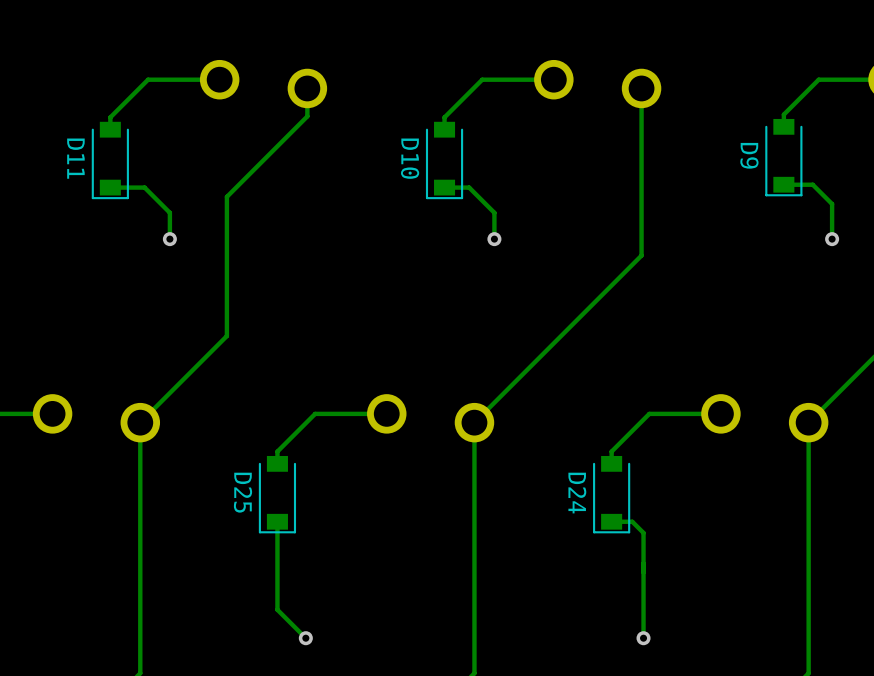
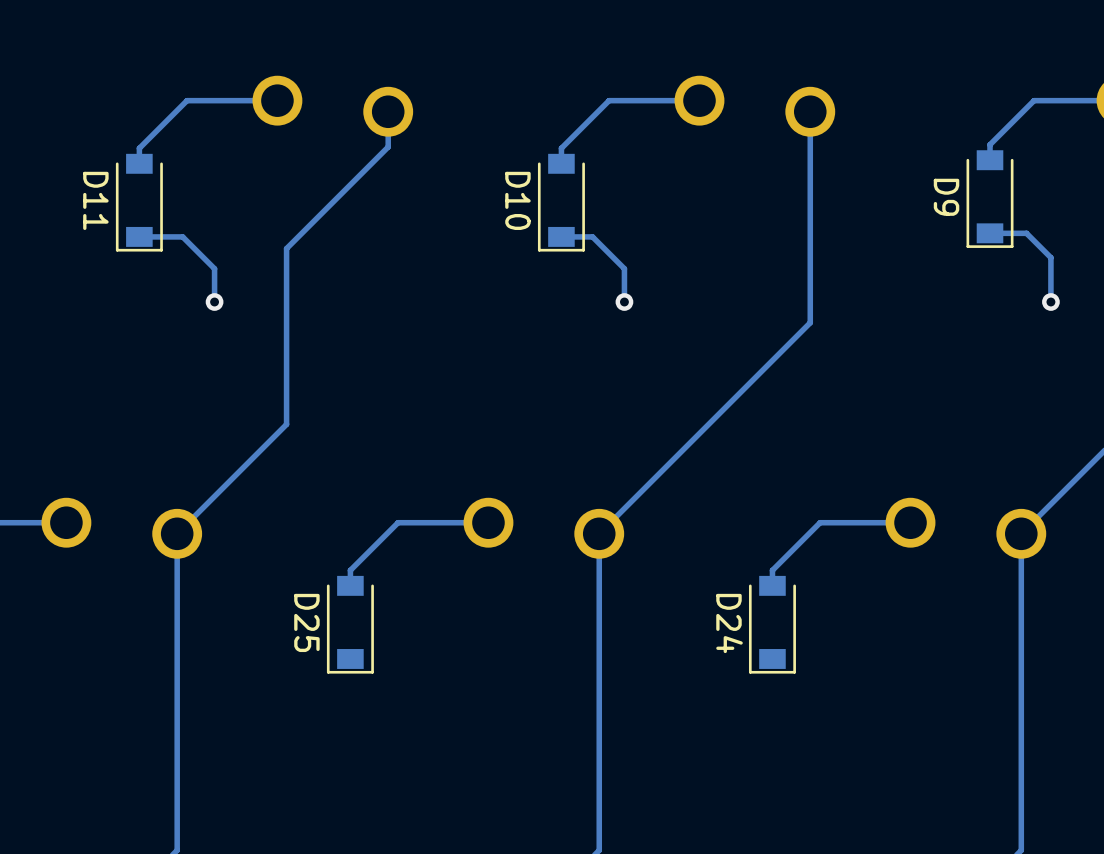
track: (277, 521) (277, 609) (305, 638) -> none
track: (611, 521) (632, 521) (643, 532) (643, 638) -> none
via: (305, 638) -> none
via: (643, 638) -> none

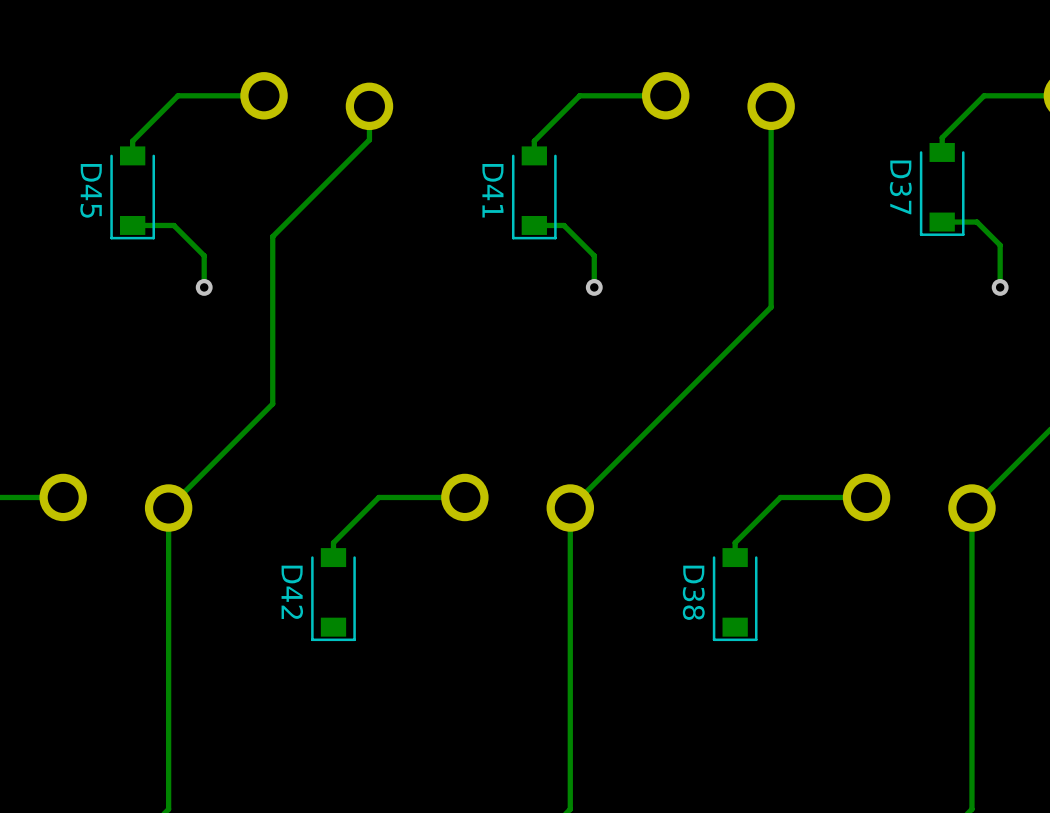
D9 name: D9 (946, 197) -> D37 (900, 187)
D11 name: D11 (95, 200) -> D45 (91, 190)
D10 name: D10 (517, 200) -> D41 (492, 190)
D25 name: D25 (306, 622) -> D42 (292, 592)
D24 name: D24 (729, 623) -> D38 (693, 592)

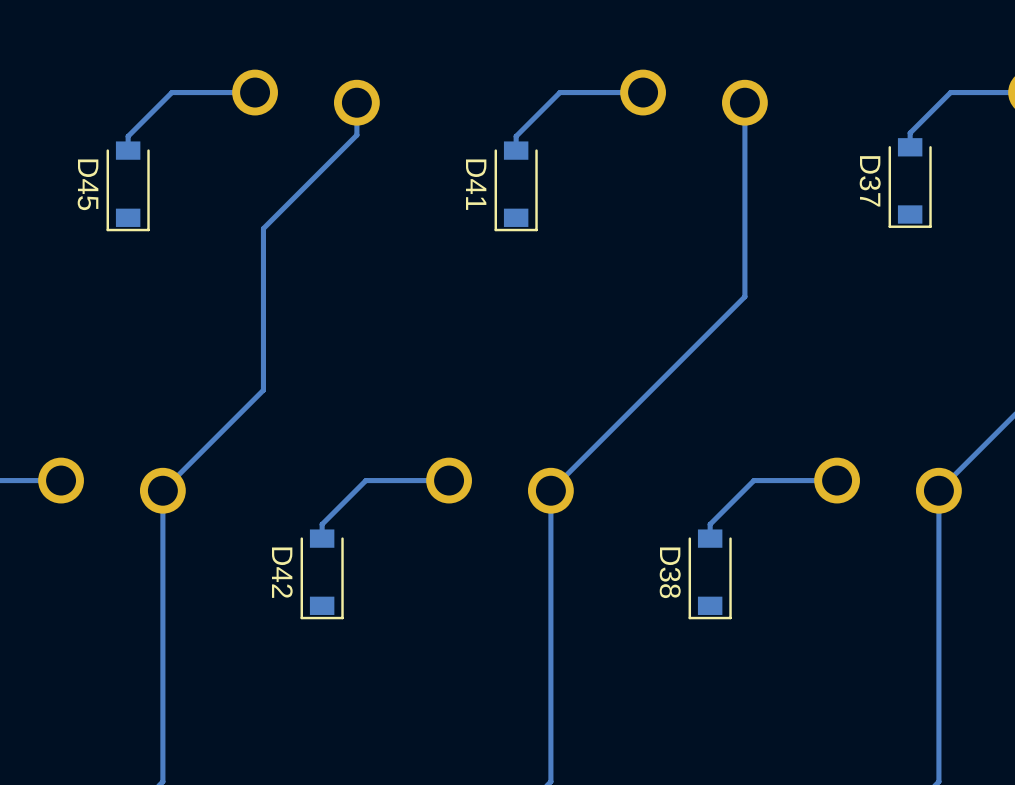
track: (942, 222) (976, 222) (1000, 245) (1000, 287) -> none
track: (132, 225) (173, 225) (204, 255) (204, 287) -> none
track: (534, 225) (563, 225) (594, 255) (594, 287) -> none
via: (204, 287) -> none
via: (594, 287) -> none
via: (1000, 287) -> none

